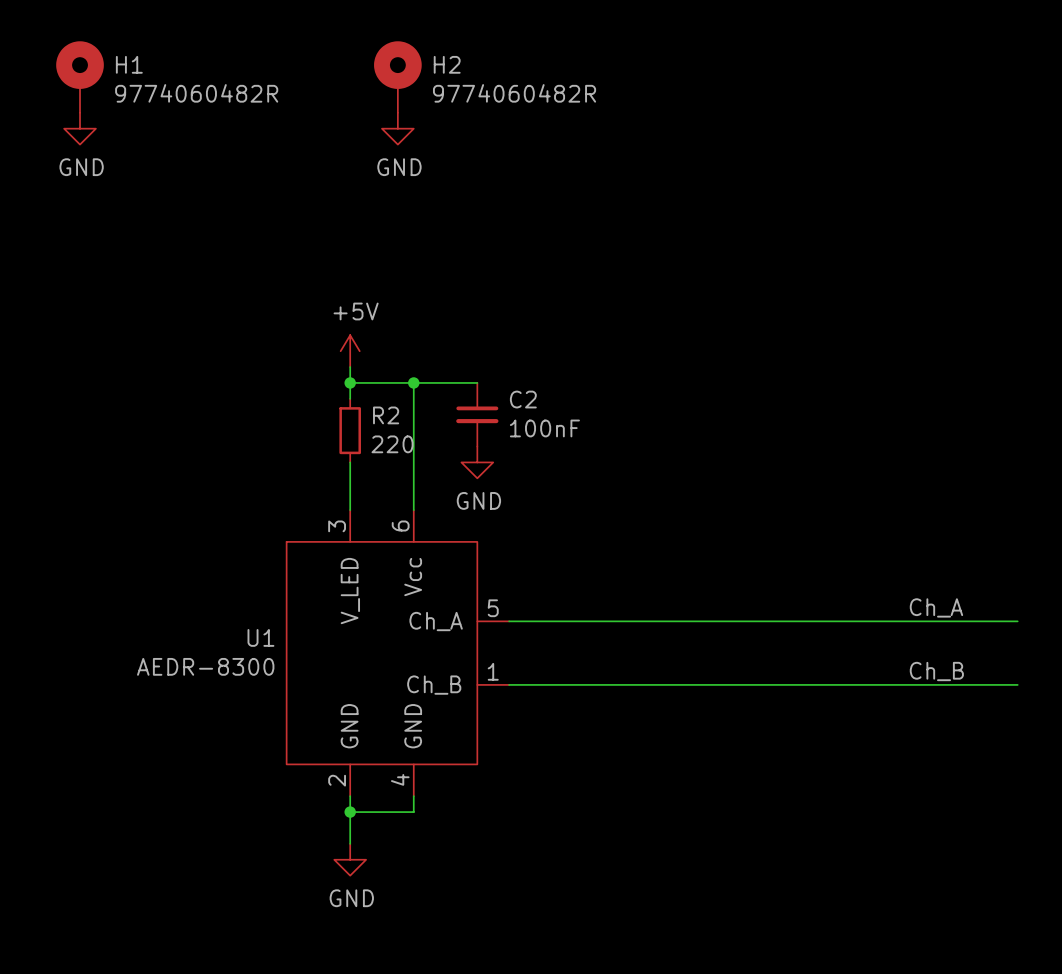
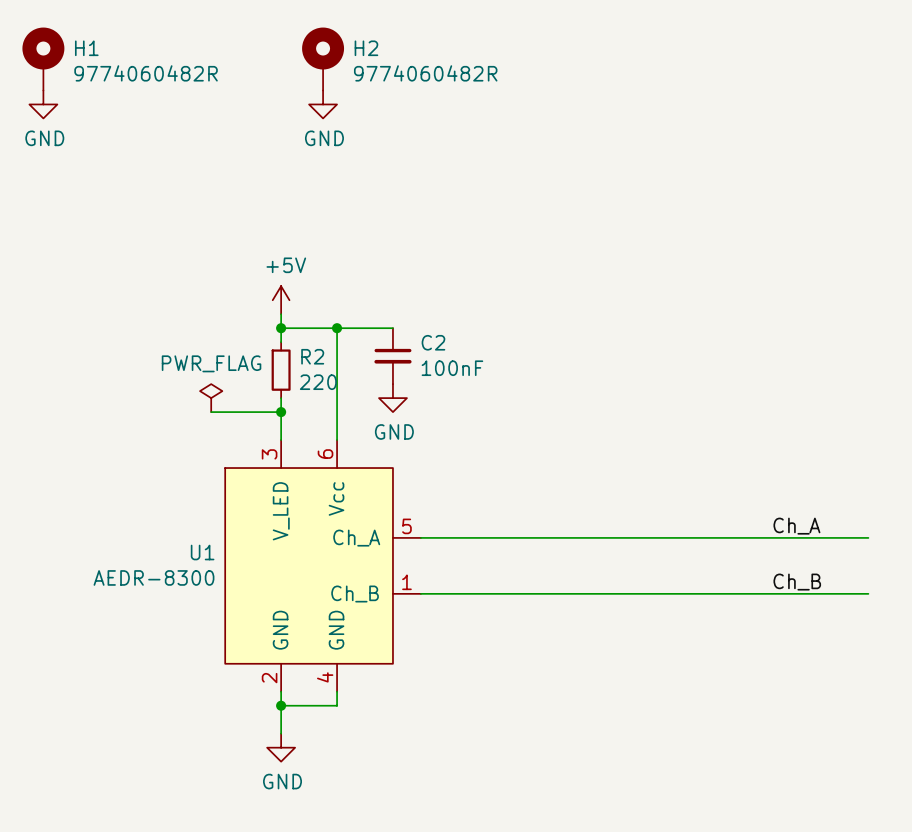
power symbol: none -> PWR_FLAG (211, 398)
wire: none -> (211, 412) (281, 412)
junction: none -> (281, 412)

